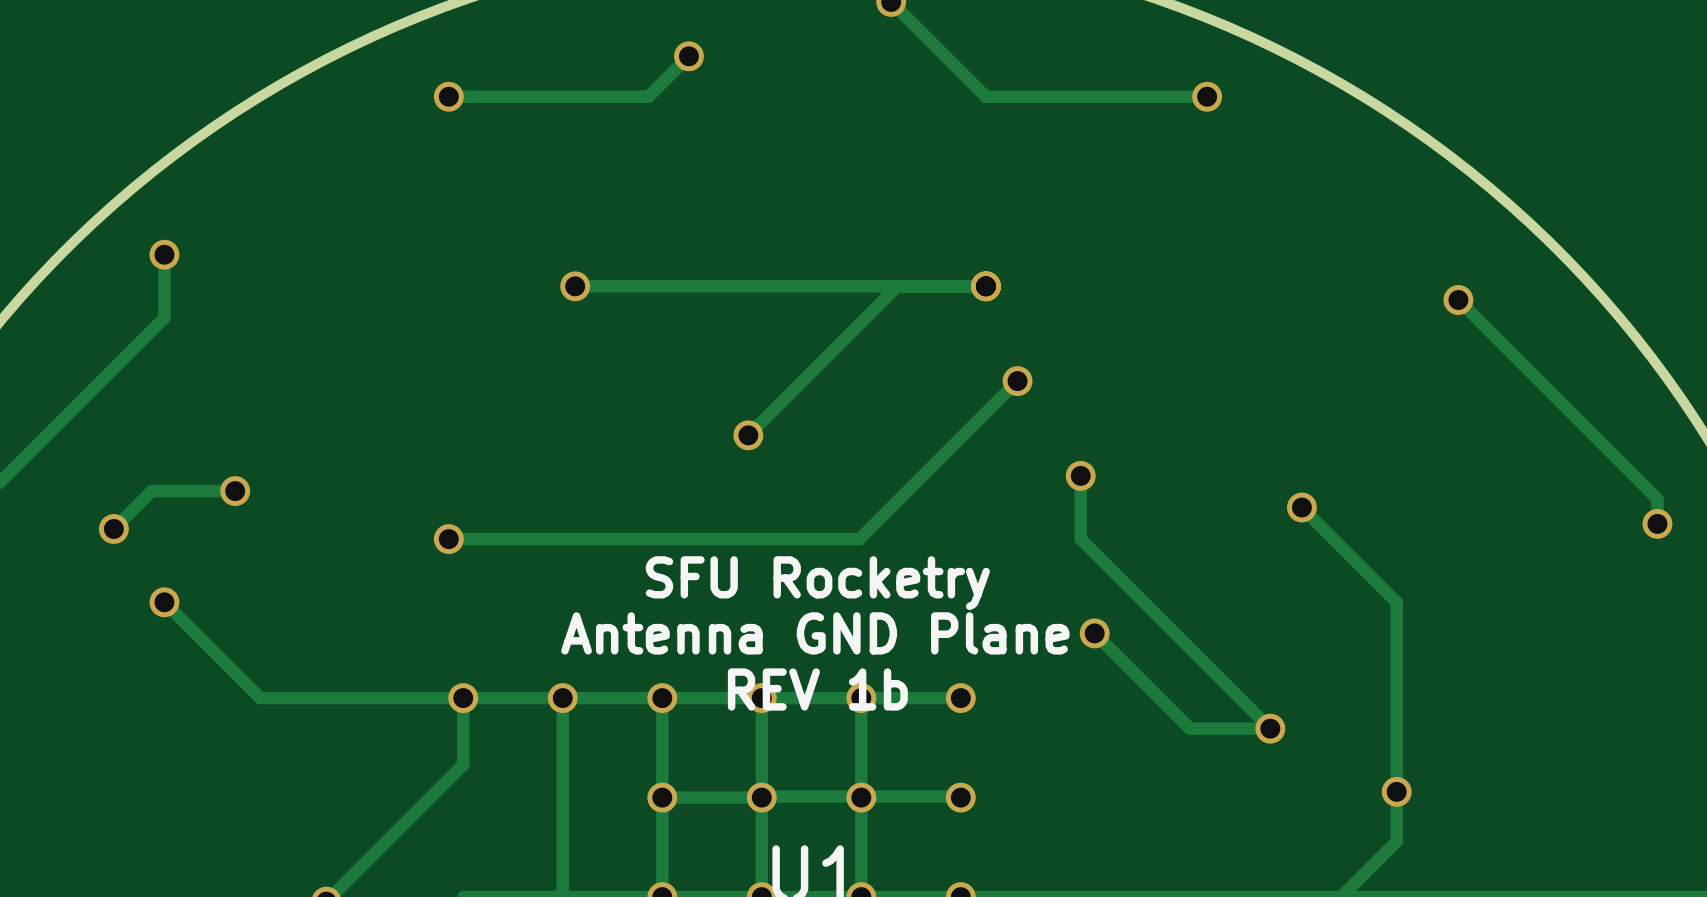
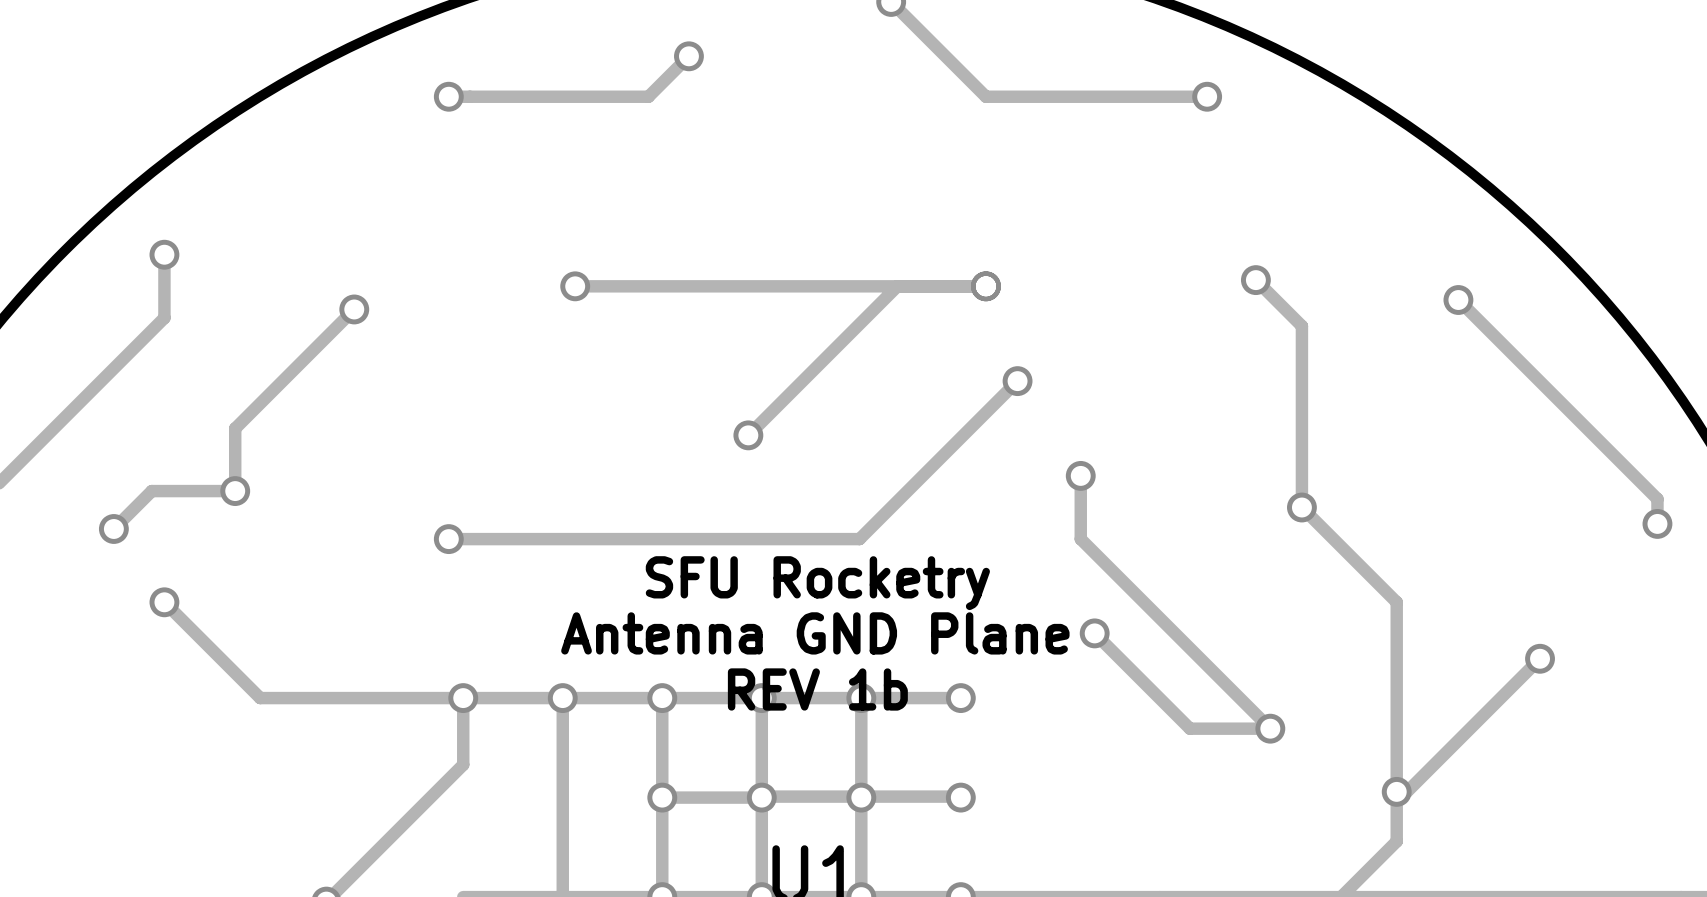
track: none -> (1255, 280) (1301, 326) (1301, 507)
via: none -> (1255, 280)
track: none -> (354, 309) (235, 428) (235, 491)
via: none -> (354, 309)
track: none -> (1540, 658) (1406, 791) (1396, 791)
via: none -> (1540, 658)

